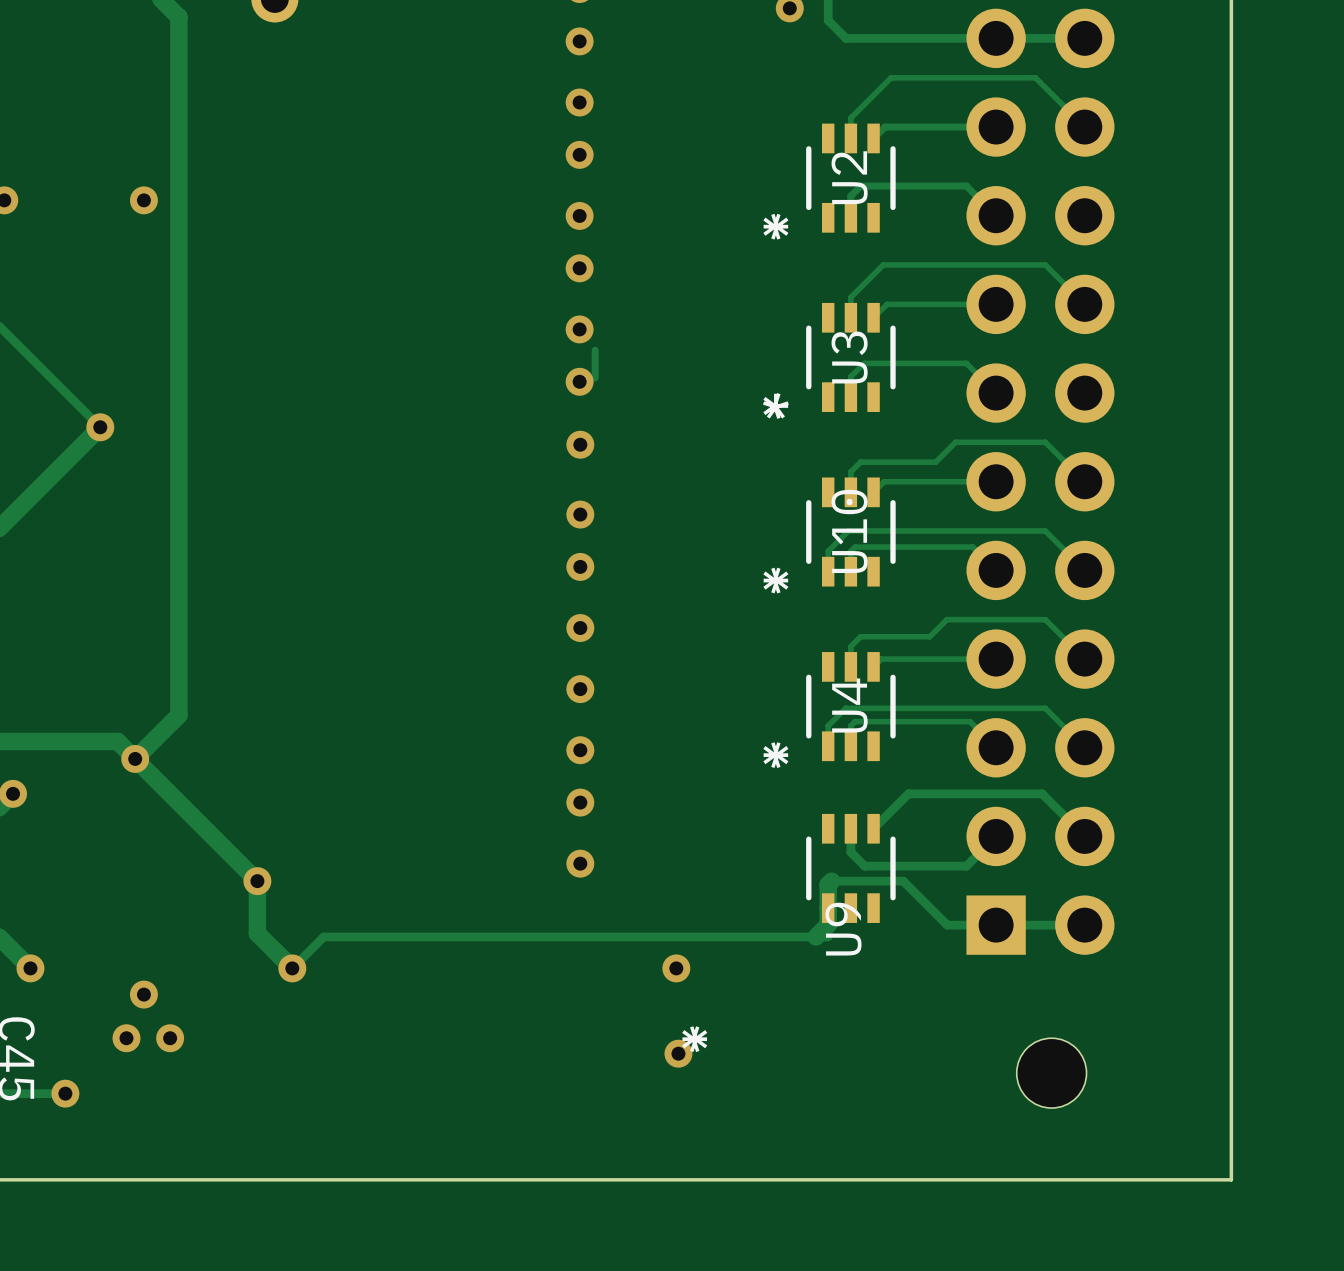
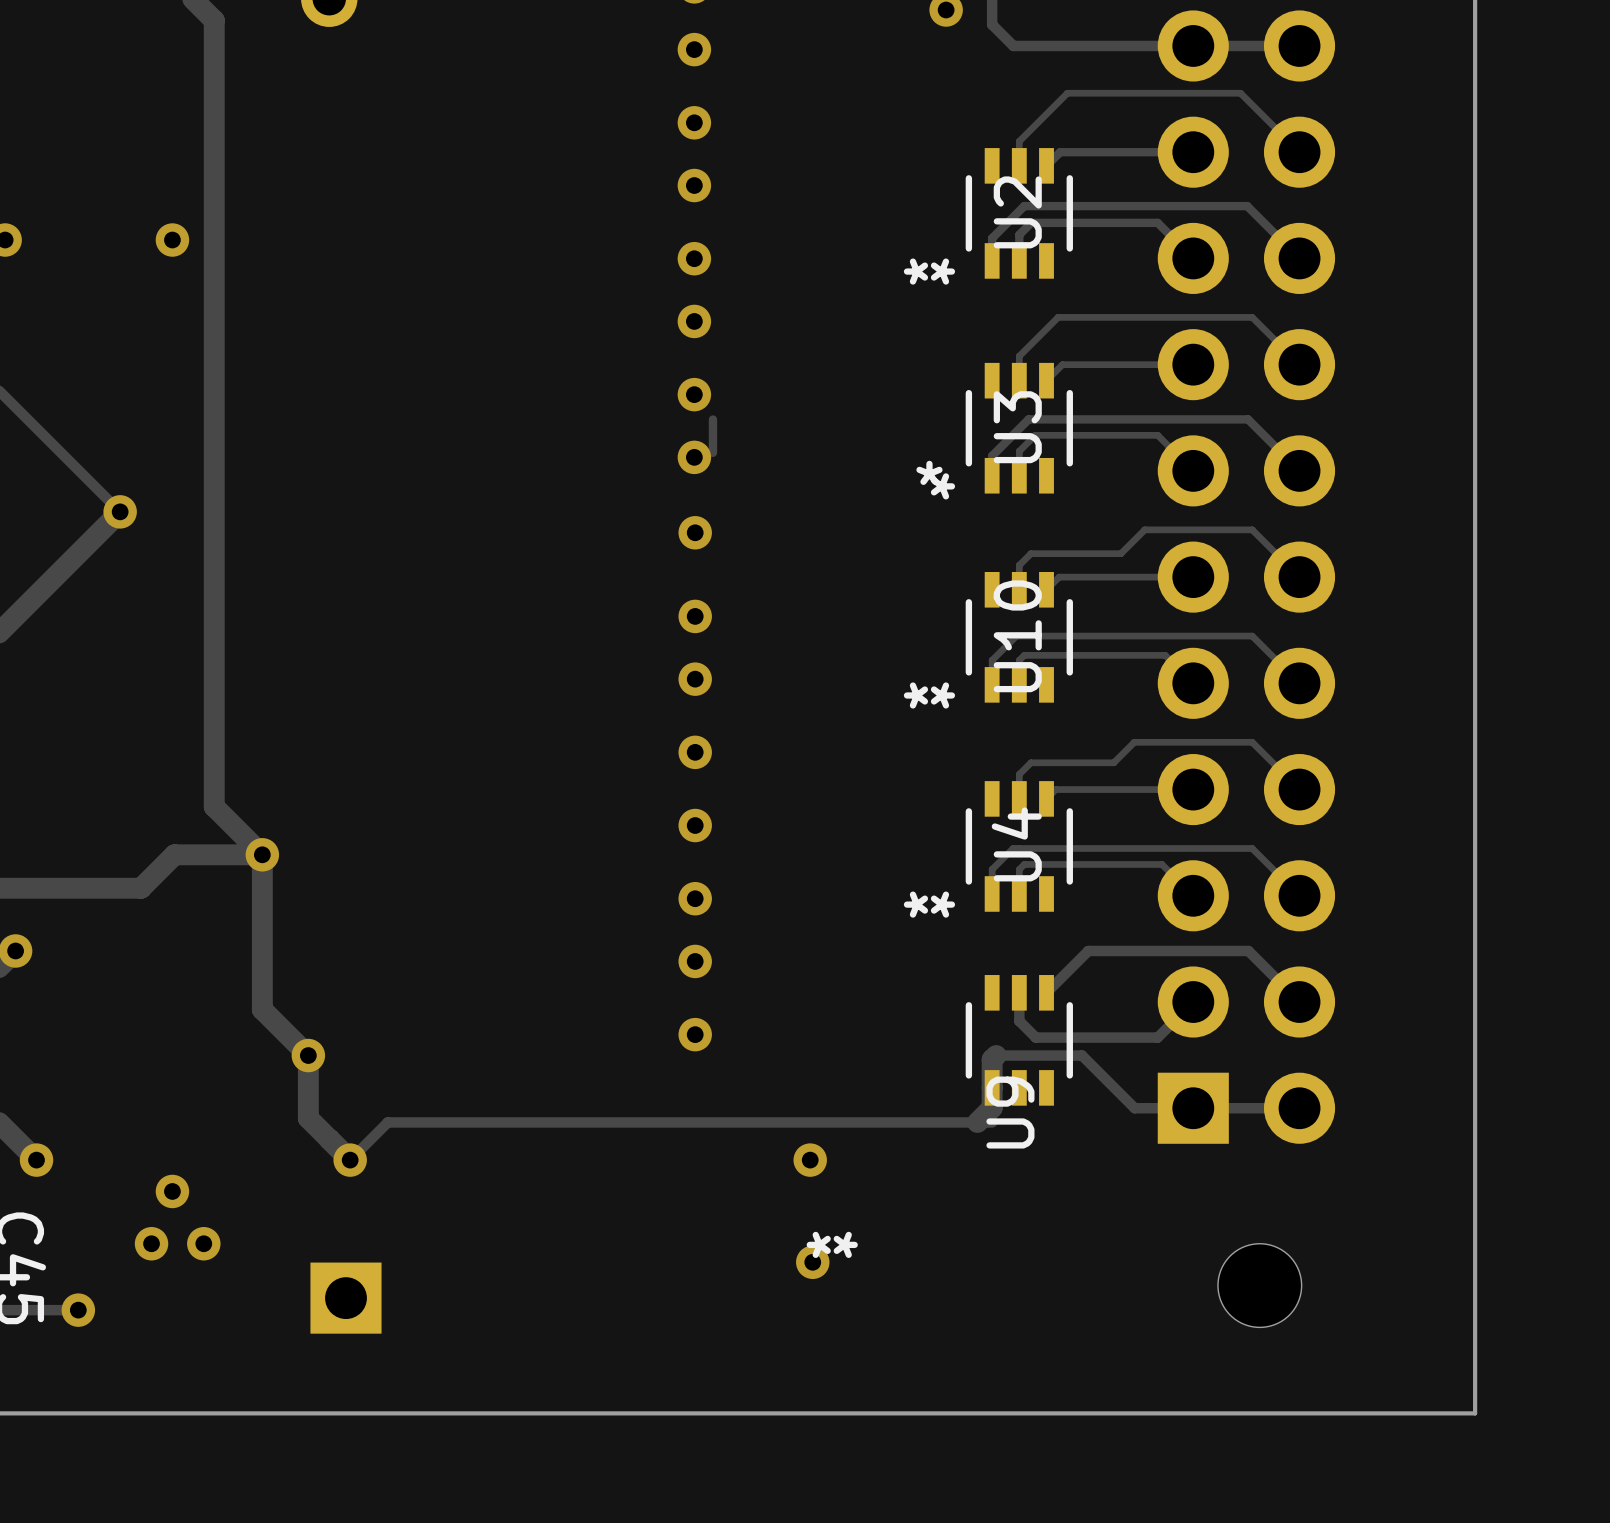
track: none -> (1299, 258) (1247, 206) (1024, 206) (992, 238) (992, 260)
track: none -> (1299, 470) (1248, 419) (1028, 419) (992, 455) (992, 475)
track: (178, 673) (178, 715) (135, 758) -> (214, 806) (262, 854)
track: none -> (262, 854) (174, 854) (141, 888)
track: (117, 741) (219, 842) -> (262, 854) (262, 1009)
via position: (135, 758) -> (262, 854)
part: none -> (345, 1298)

